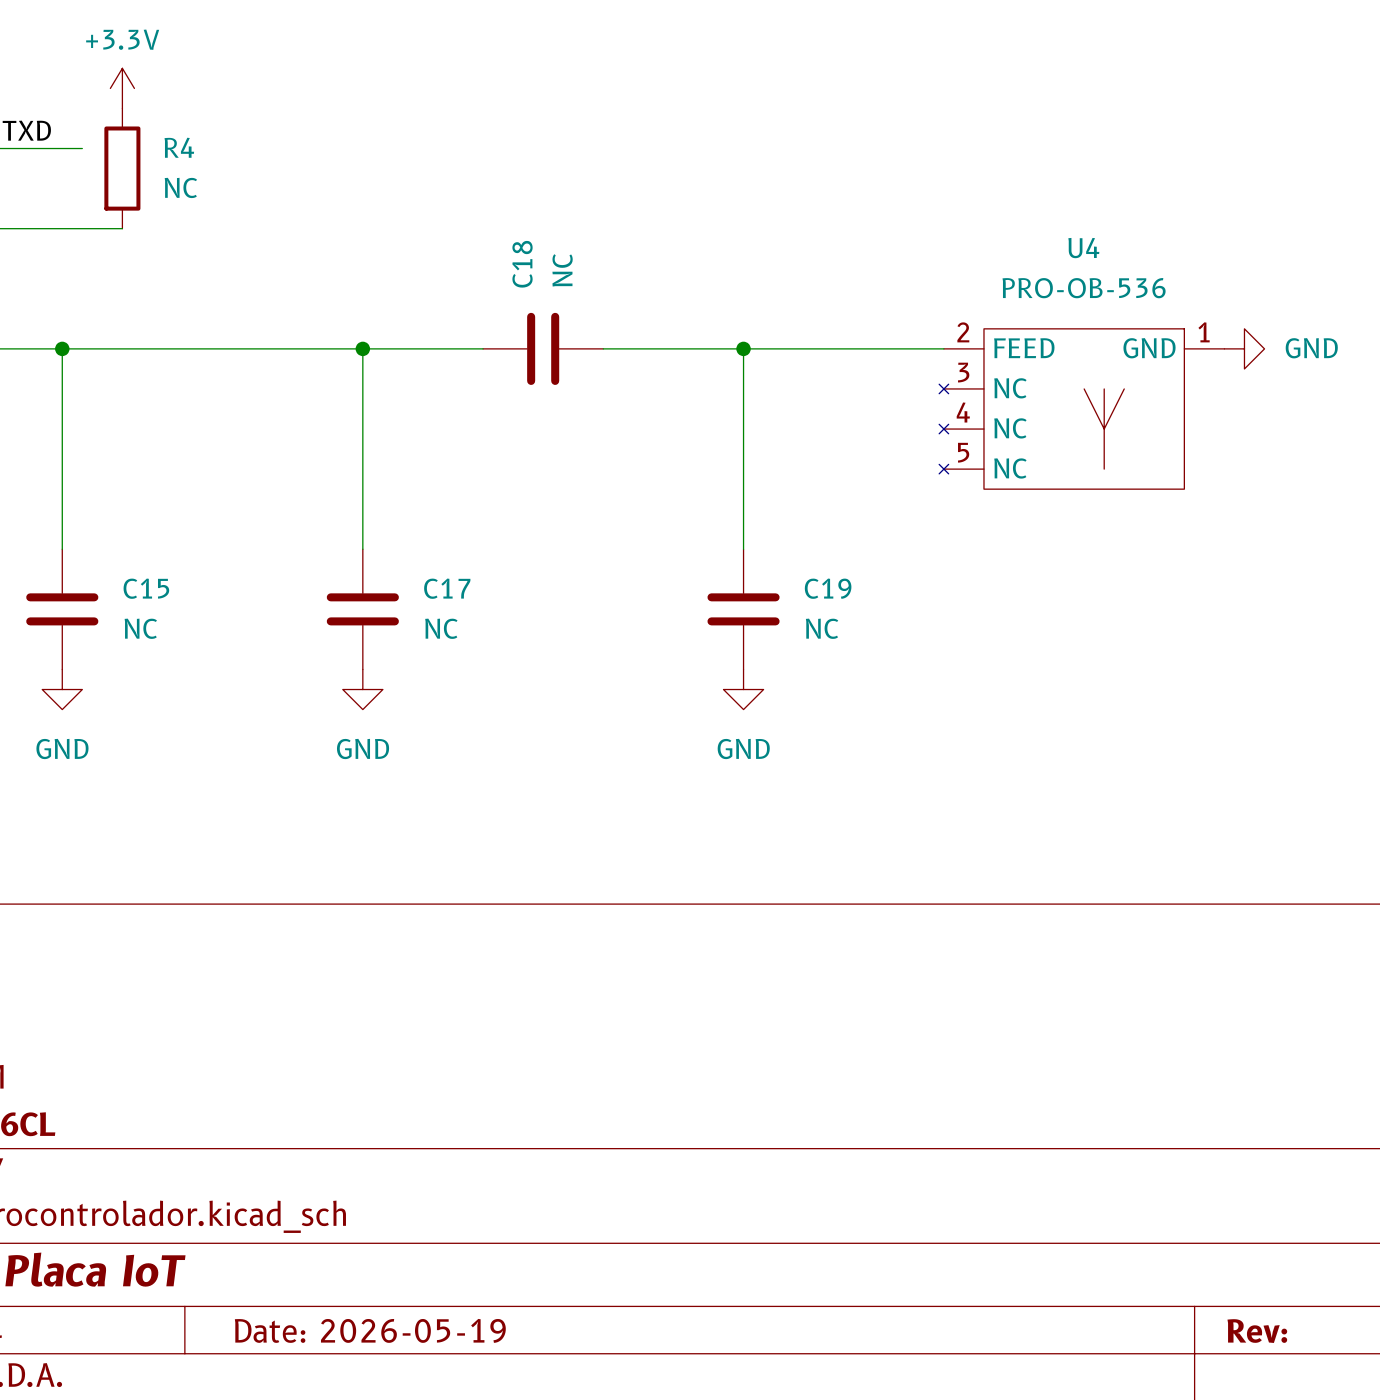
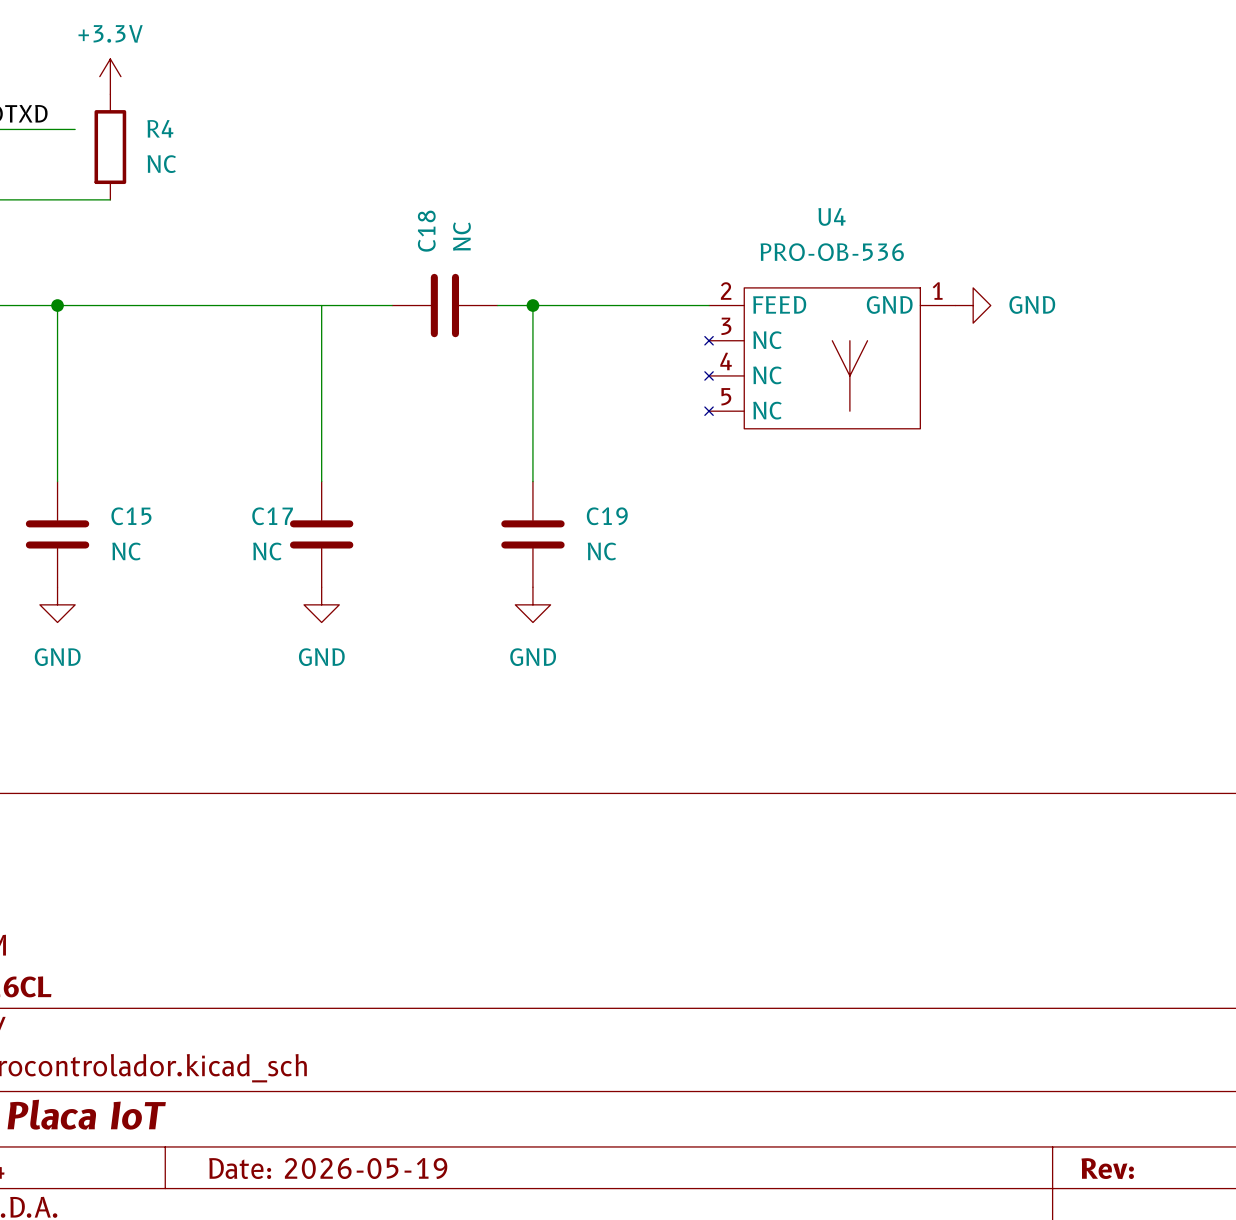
junction: (362, 348) -> none
C18 position: (543, 348) -> (444, 305)
wire: none -> (497, 305) (532, 305) (532, 481)
junction: none -> (532, 305)
wire: (743, 348) (743, 549) -> none
junction: (743, 348) -> none
wire: (803, 348) (943, 348) -> none
power symbol position: GND (1244, 348) -> GND (973, 305)
U4 position: (1081, 409) -> (830, 358)
C17 name position: C17 (447, 588) -> C17 (272, 516)
C19 position: (743, 609) -> (532, 534)
C17 value position: NC (441, 628) -> NC (267, 551)
power symbol position: GND (743, 689) -> GND (532, 604)

